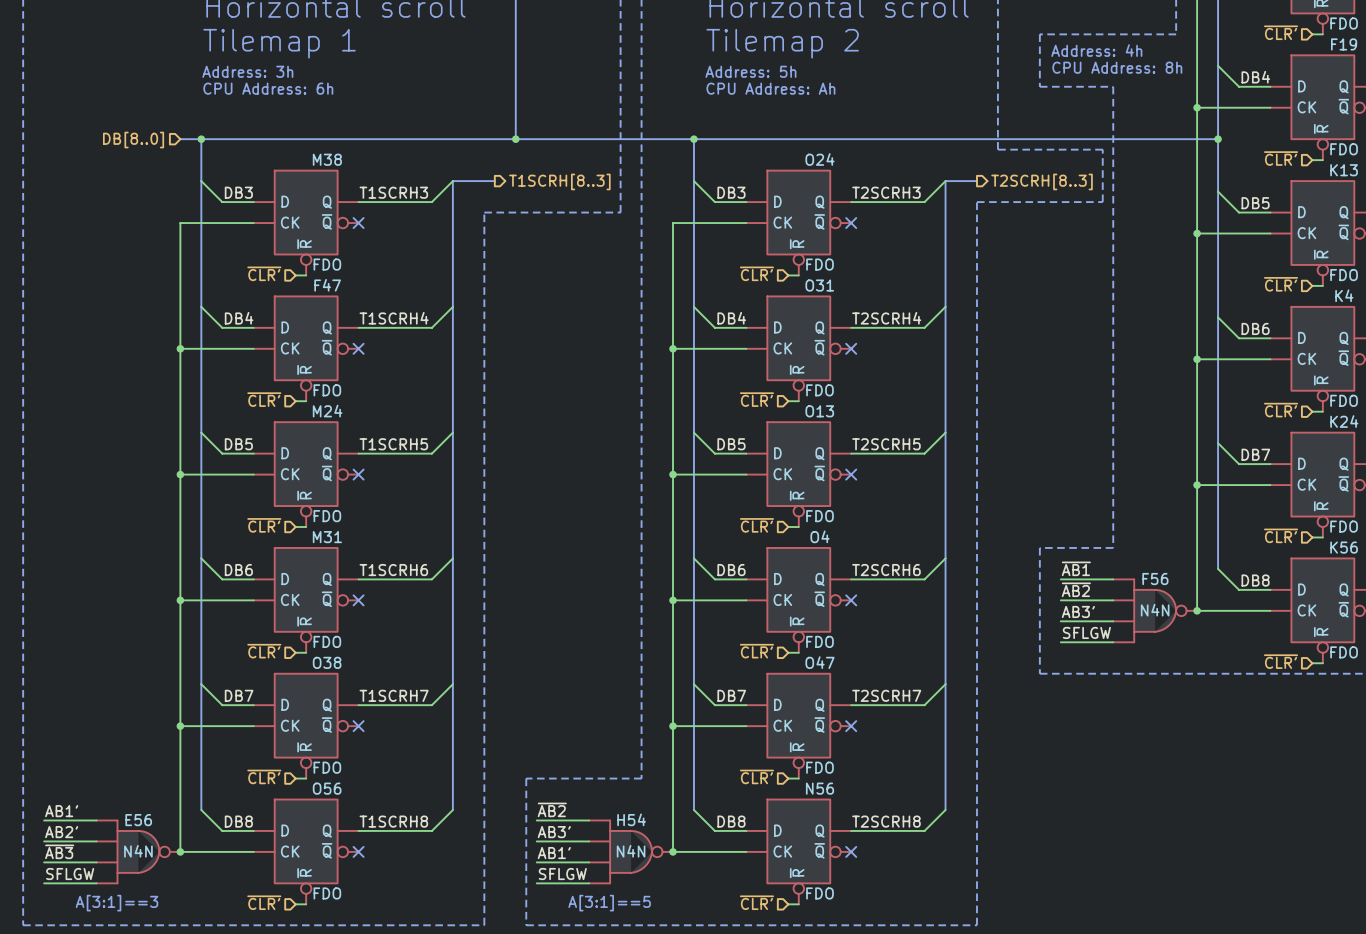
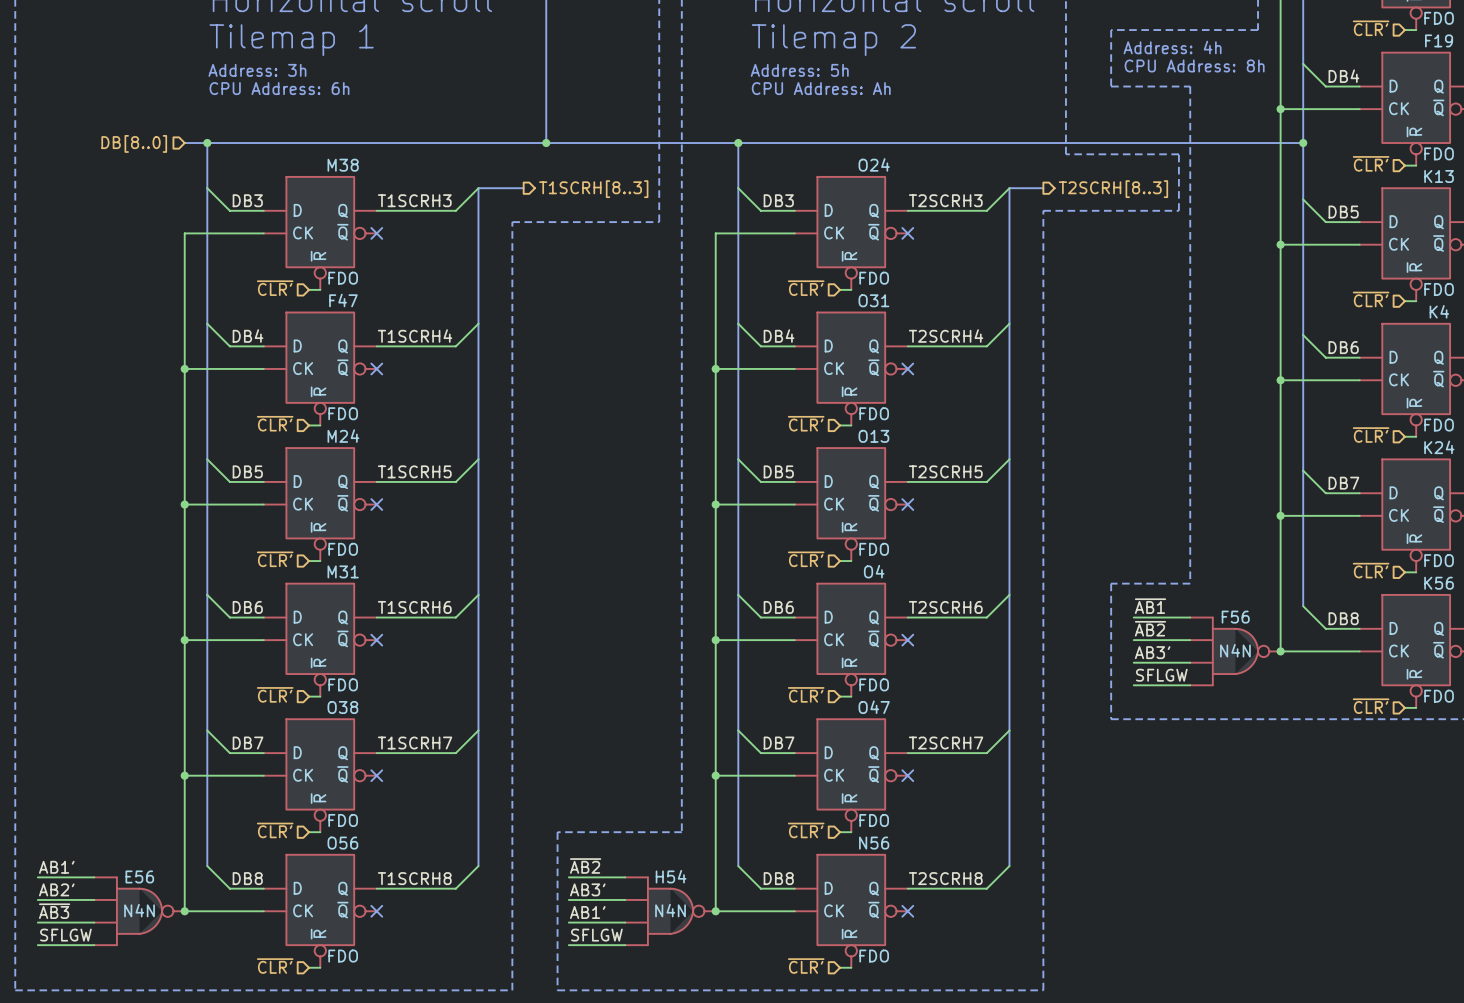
text: A[3:1]==3 (116, 903) -> none
text: A[3:1]==5 (609, 903) -> none

